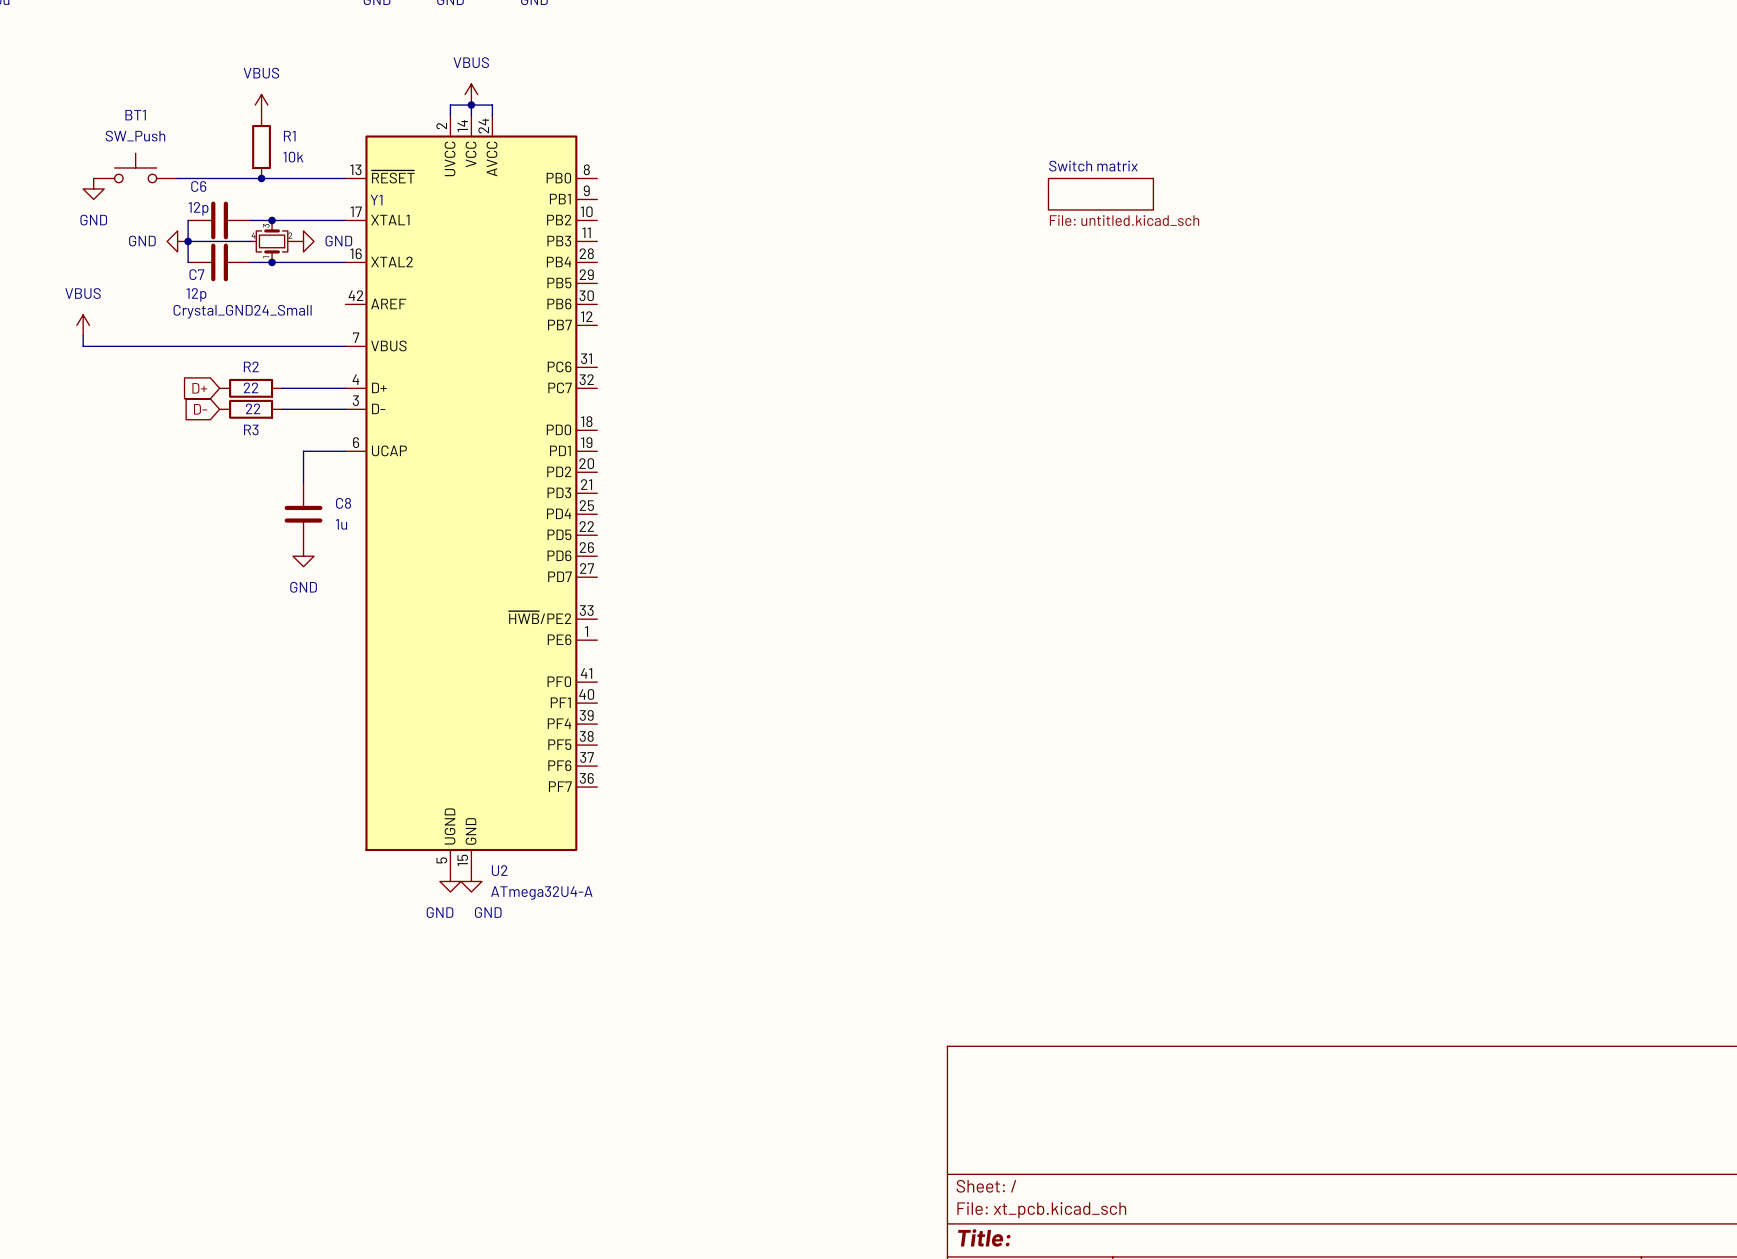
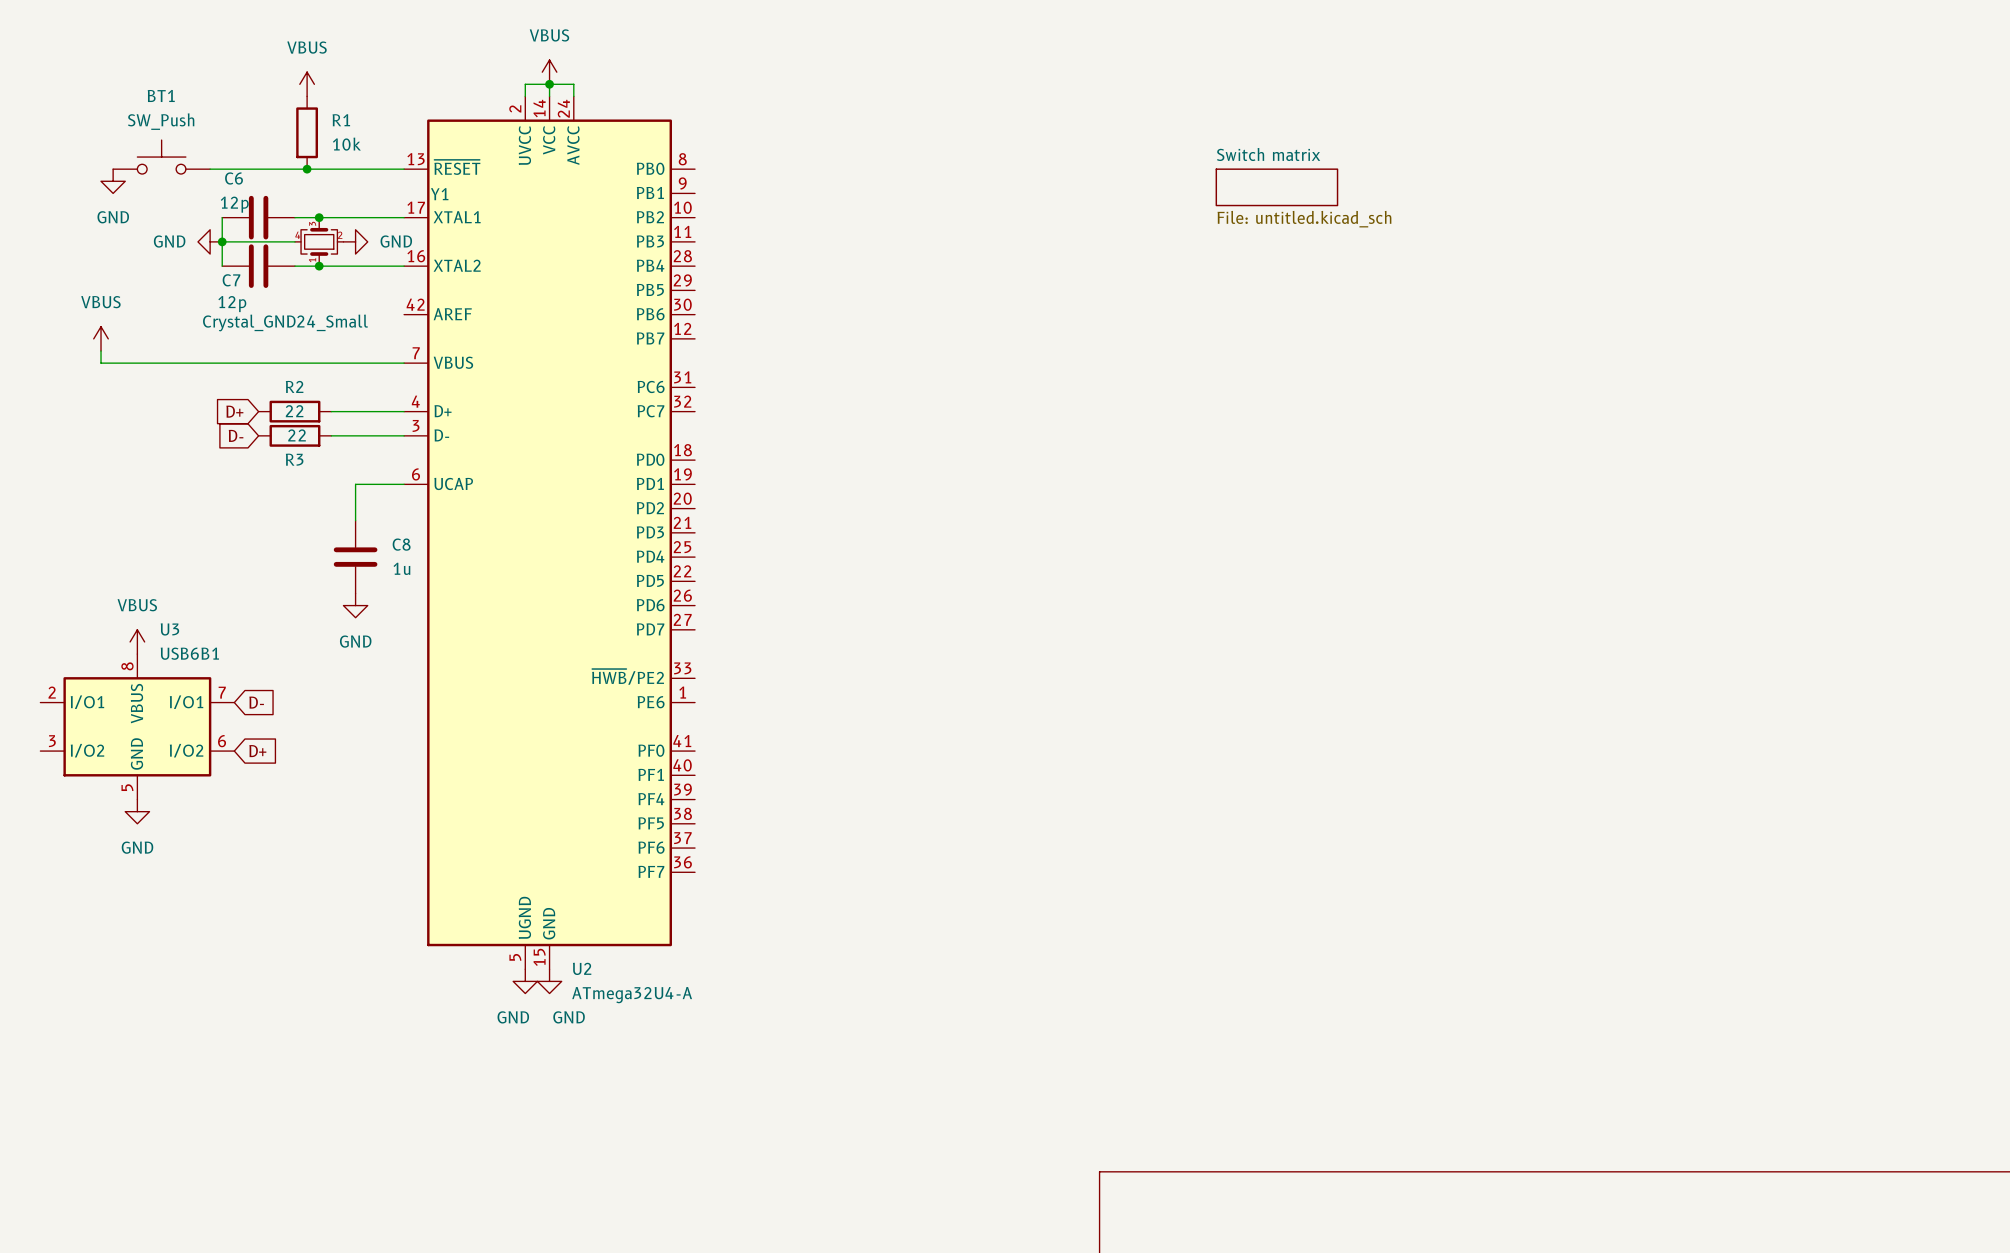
power symbol: none -> VBUS (137, 641)
global label: none -> D- (256, 702)
U3: none -> USB6B1 (137, 726)
global label: none -> D+ (257, 751)
power symbol: none -> GND (137, 811)

